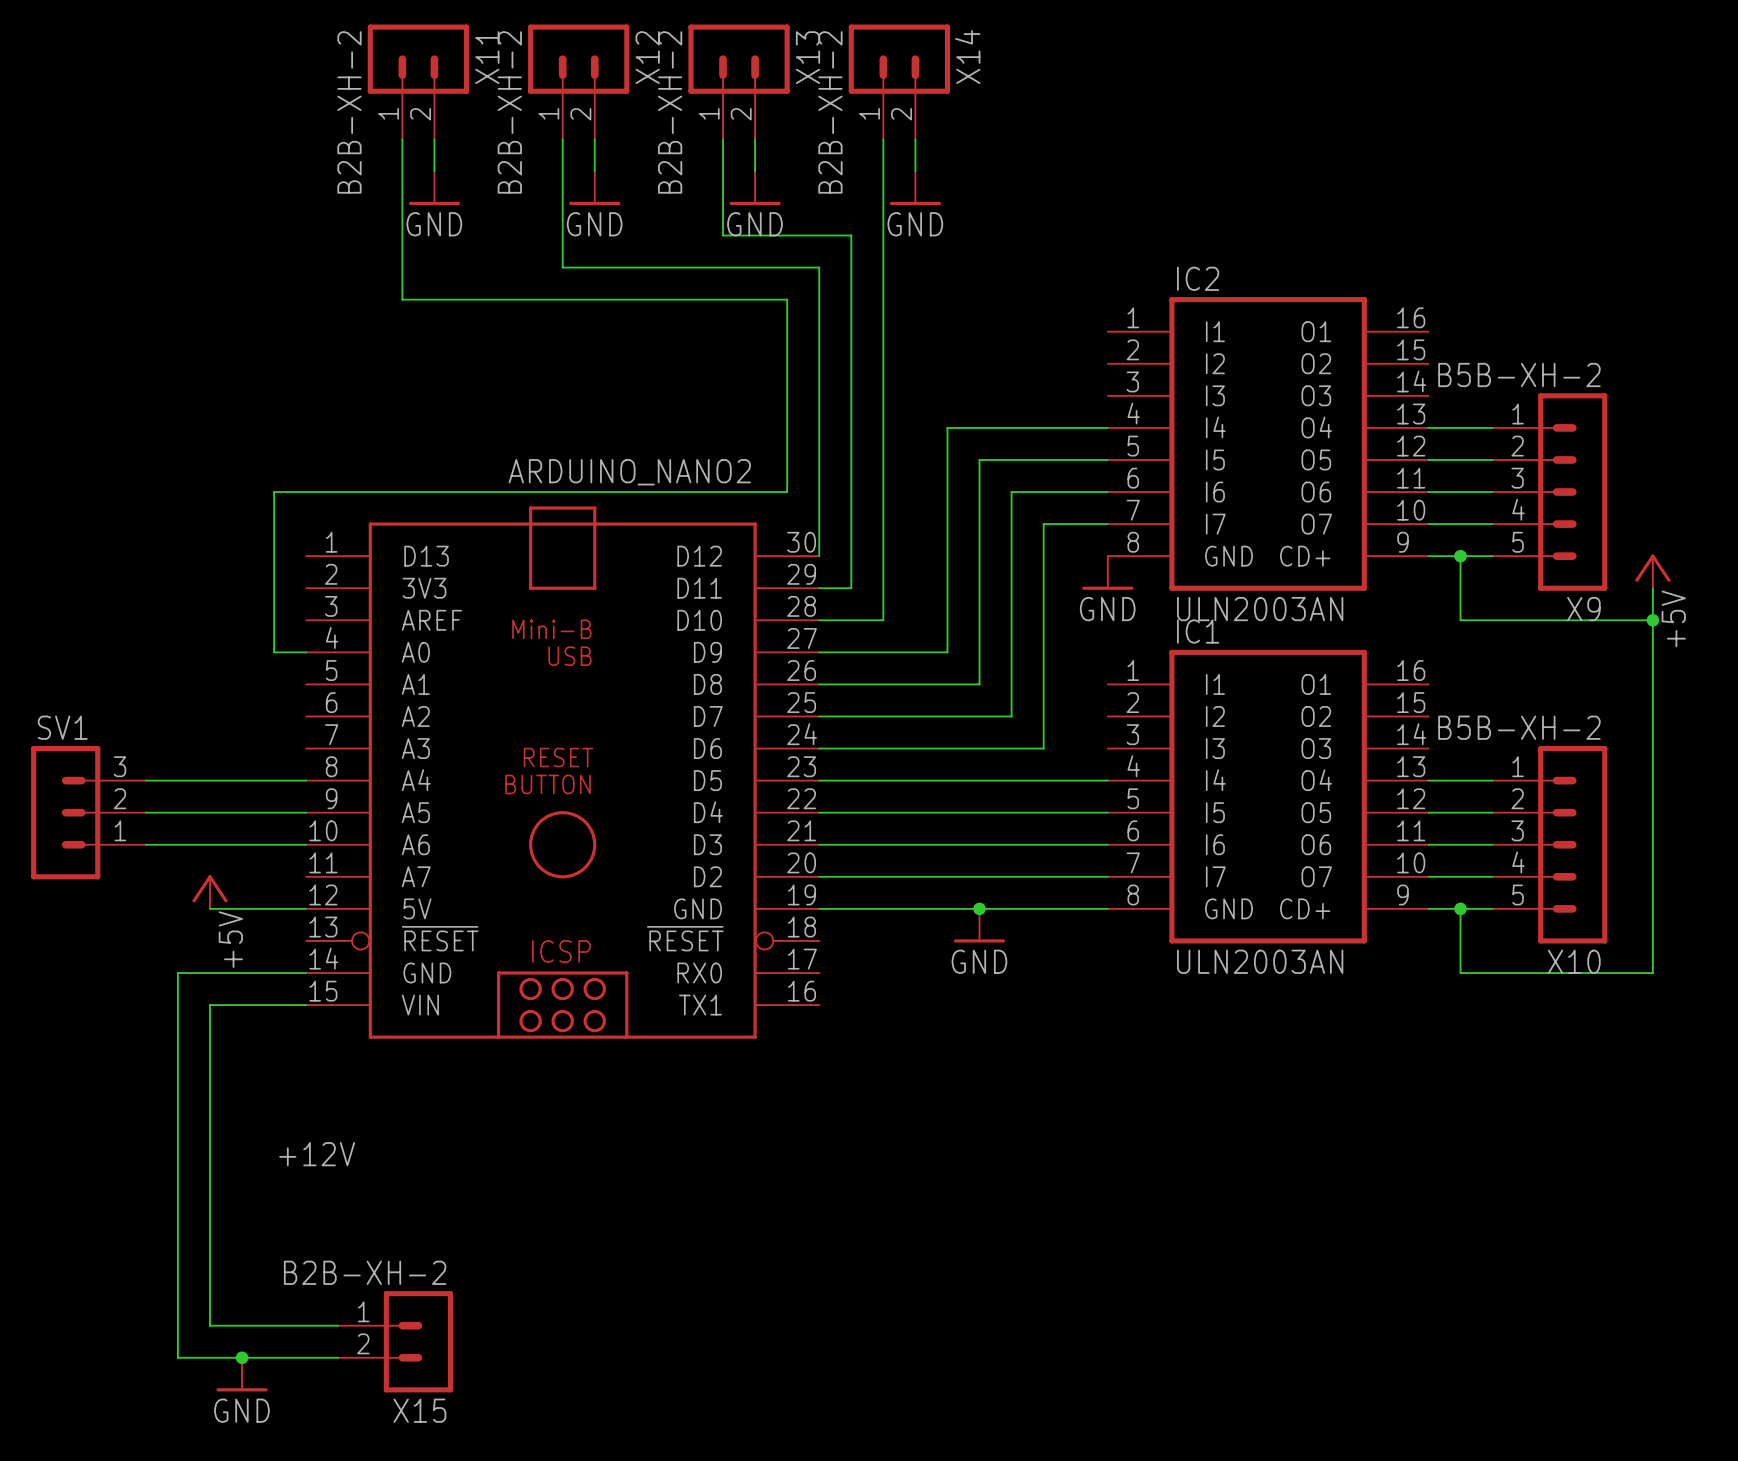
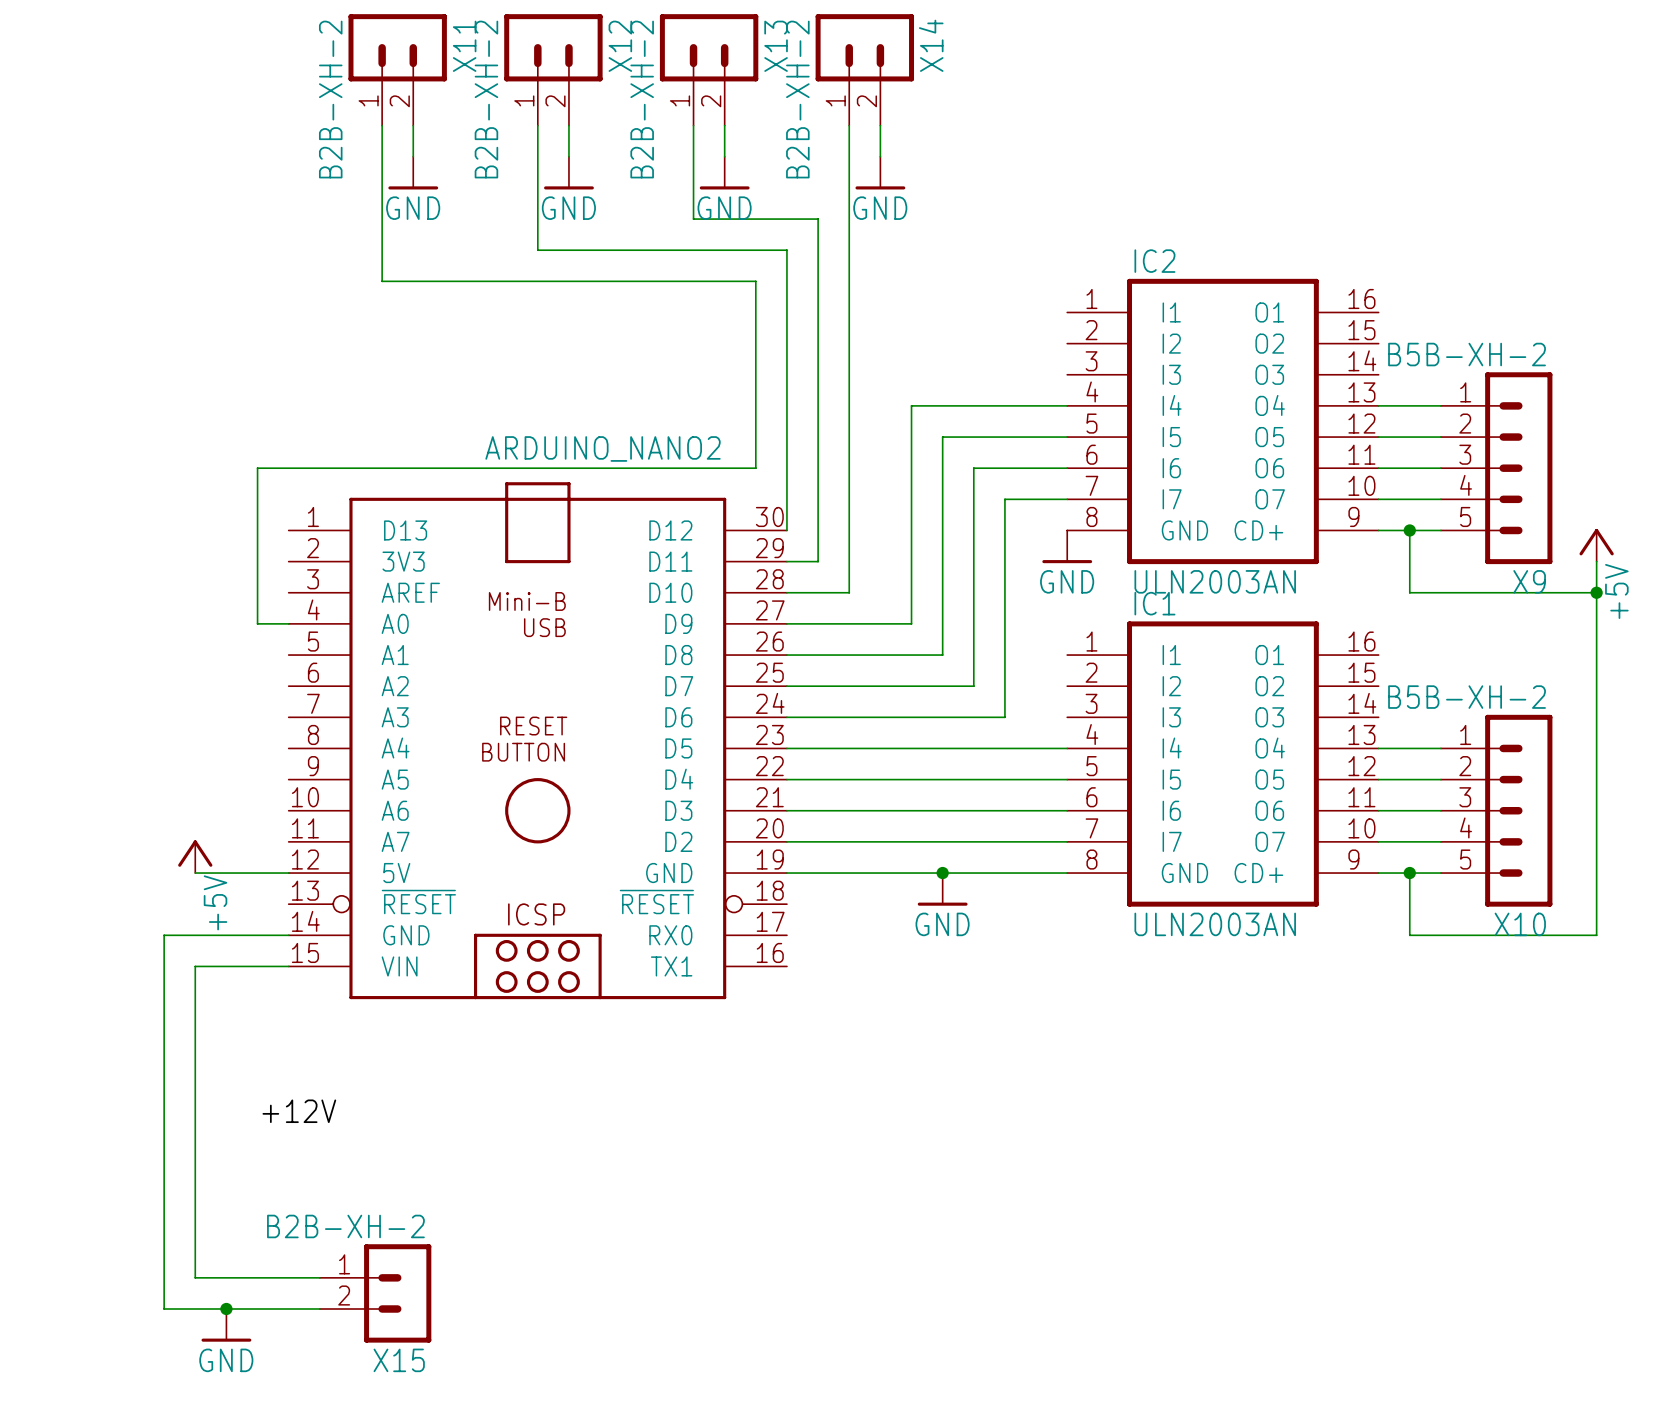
wire: (145, 780) (306, 780) -> none
SV1: (88, 812) -> none
wire: (145, 812) (306, 812) -> none
wire: (145, 844) (306, 844) -> none

